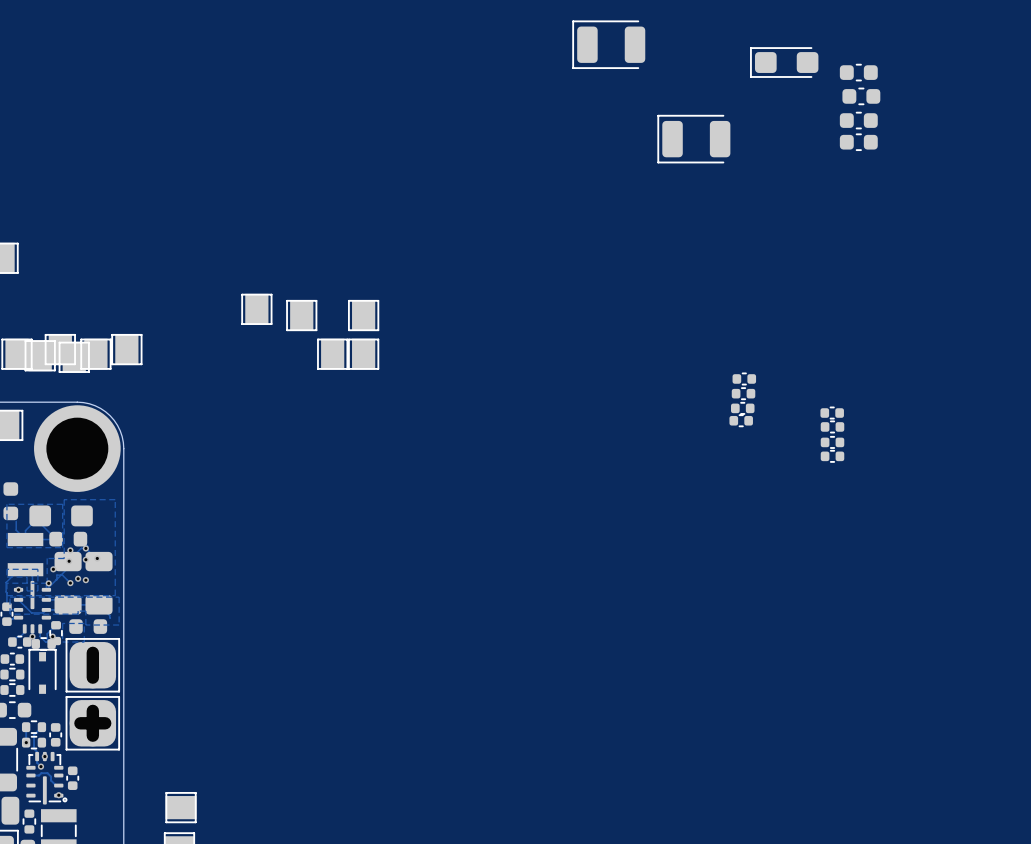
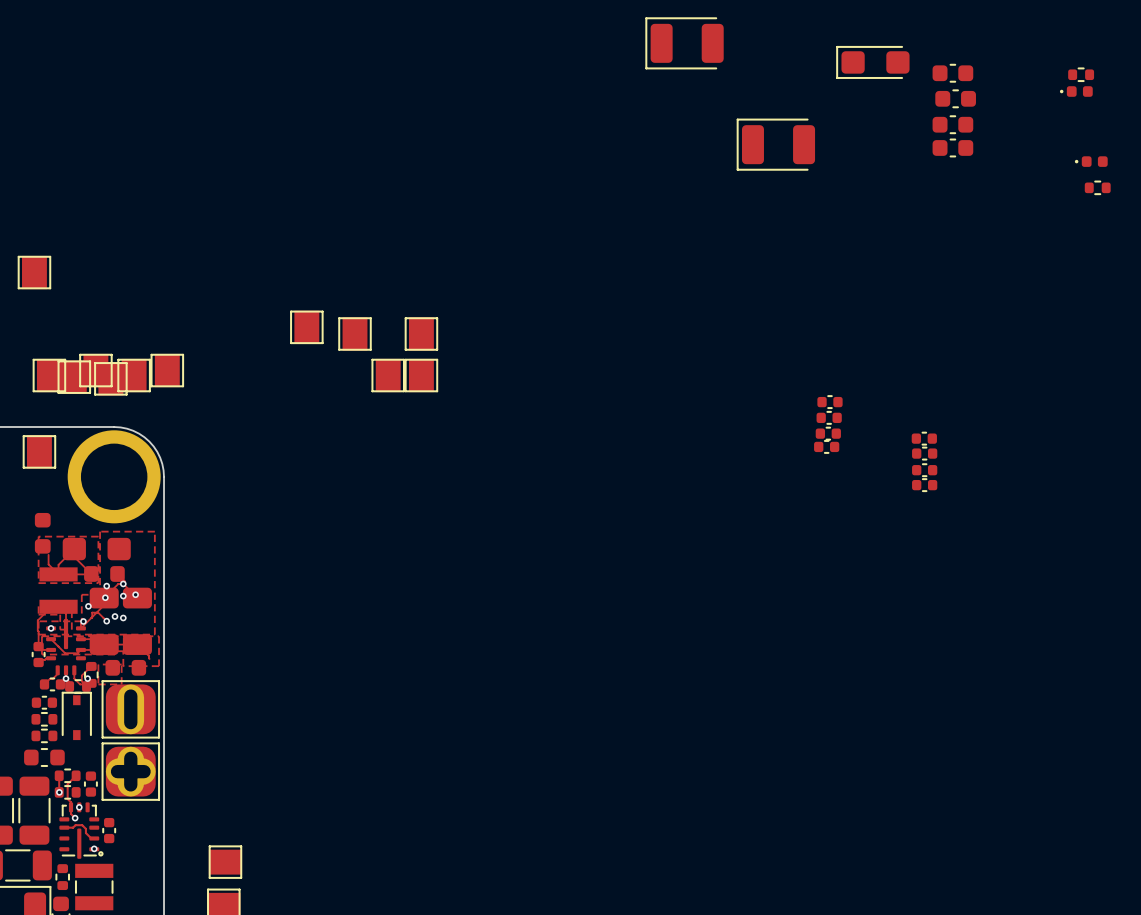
part: none -> (1081, 74)
part: none -> (1076, 91)
part: none -> (1091, 161)
part: none -> (1097, 187)

